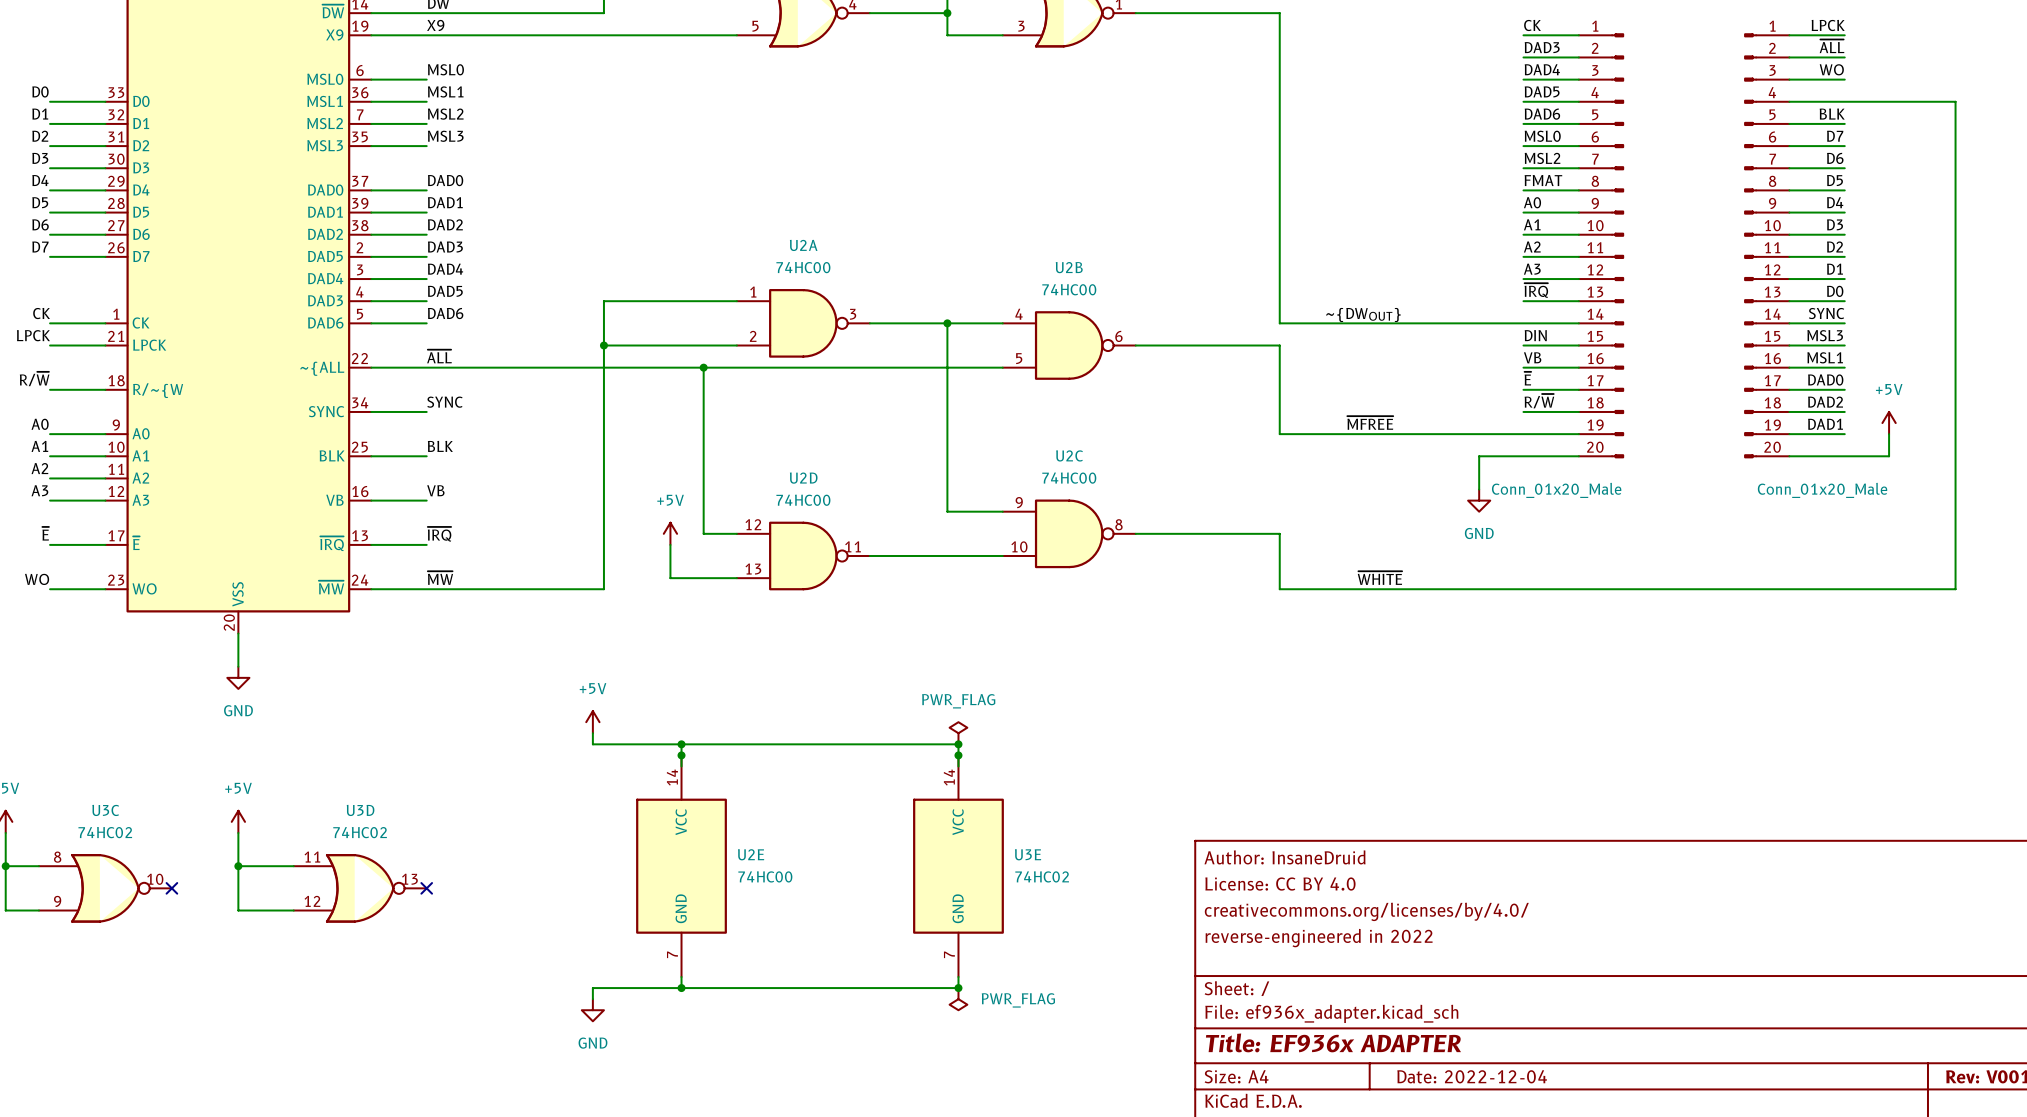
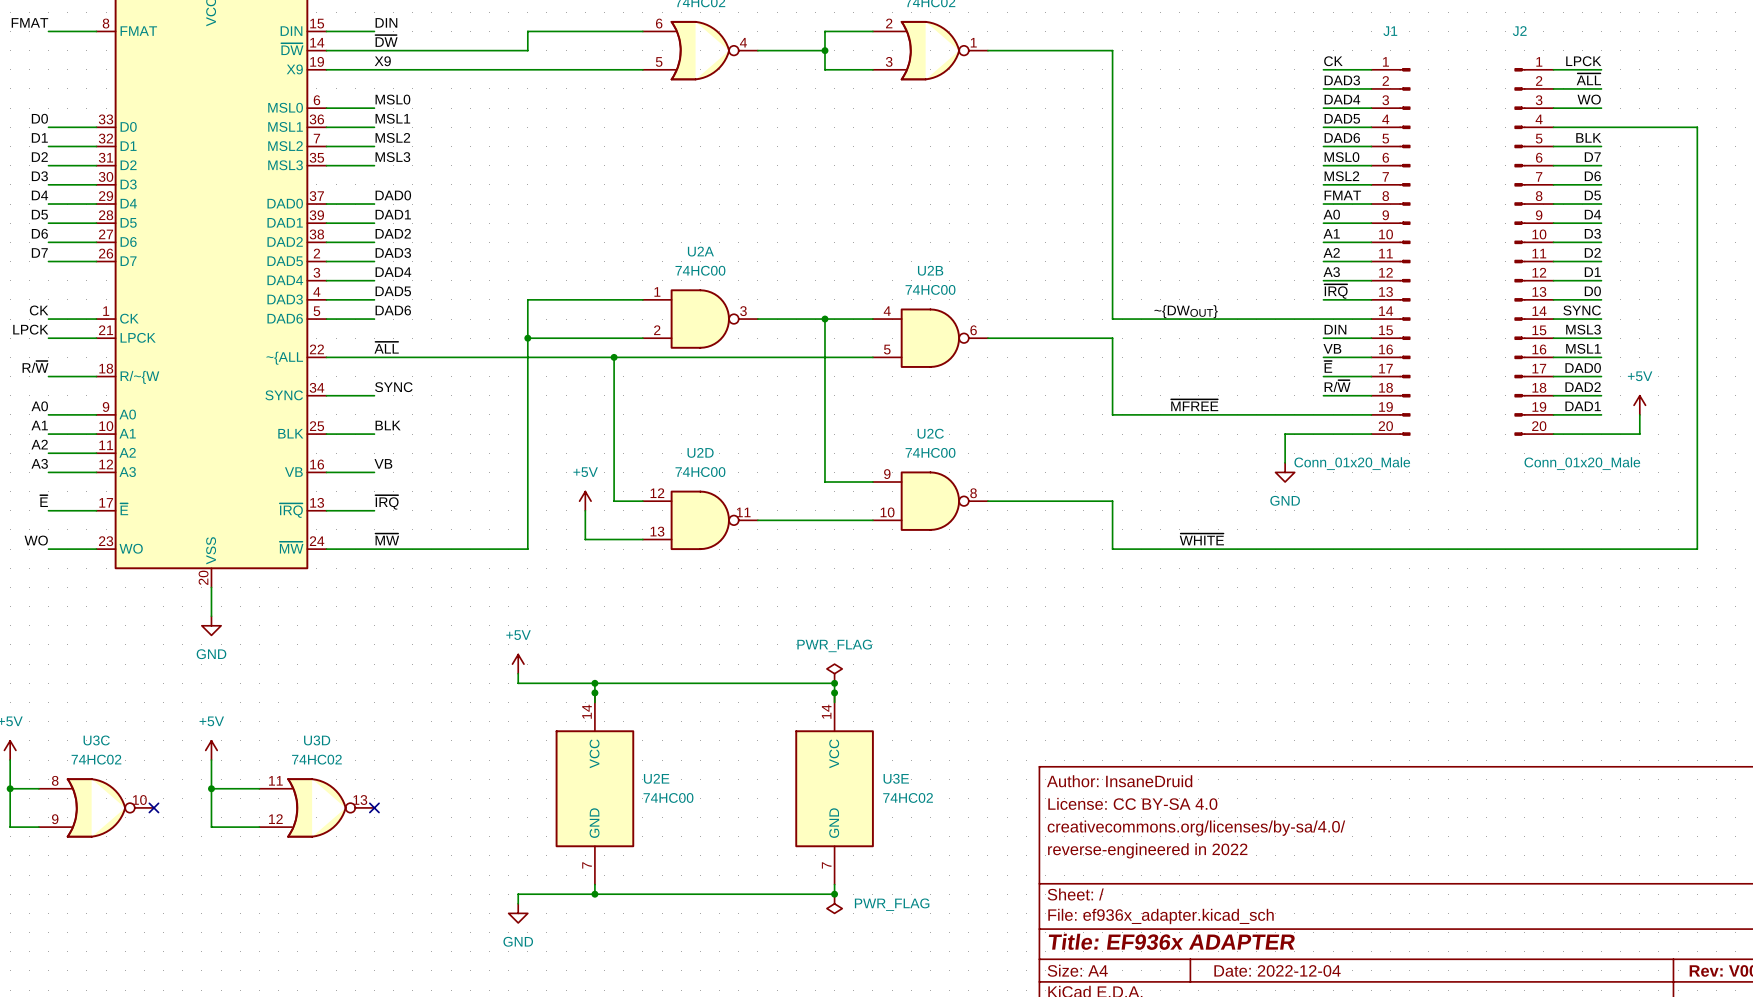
title block: License: CC BY 4.0 (1280, 884) -> License: CC BY-SA 4.0 (1132, 803)
title block: creativecommons.org/licenses/by/4.0/ (1366, 911) -> creativecommons.org/licenses/by-sa/4.0/ (1196, 828)

